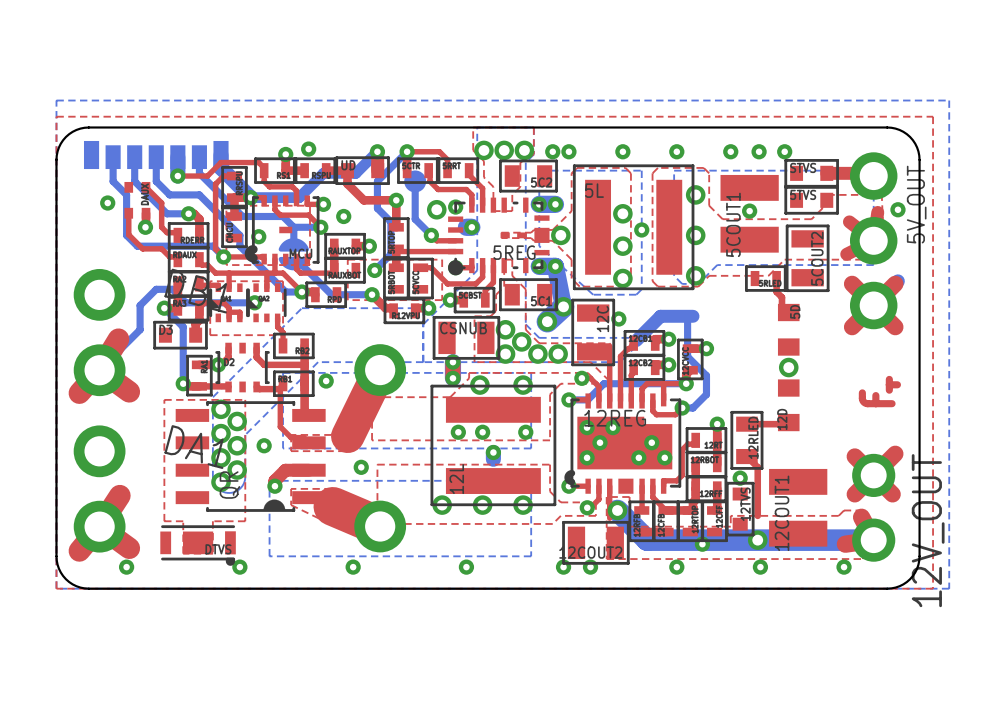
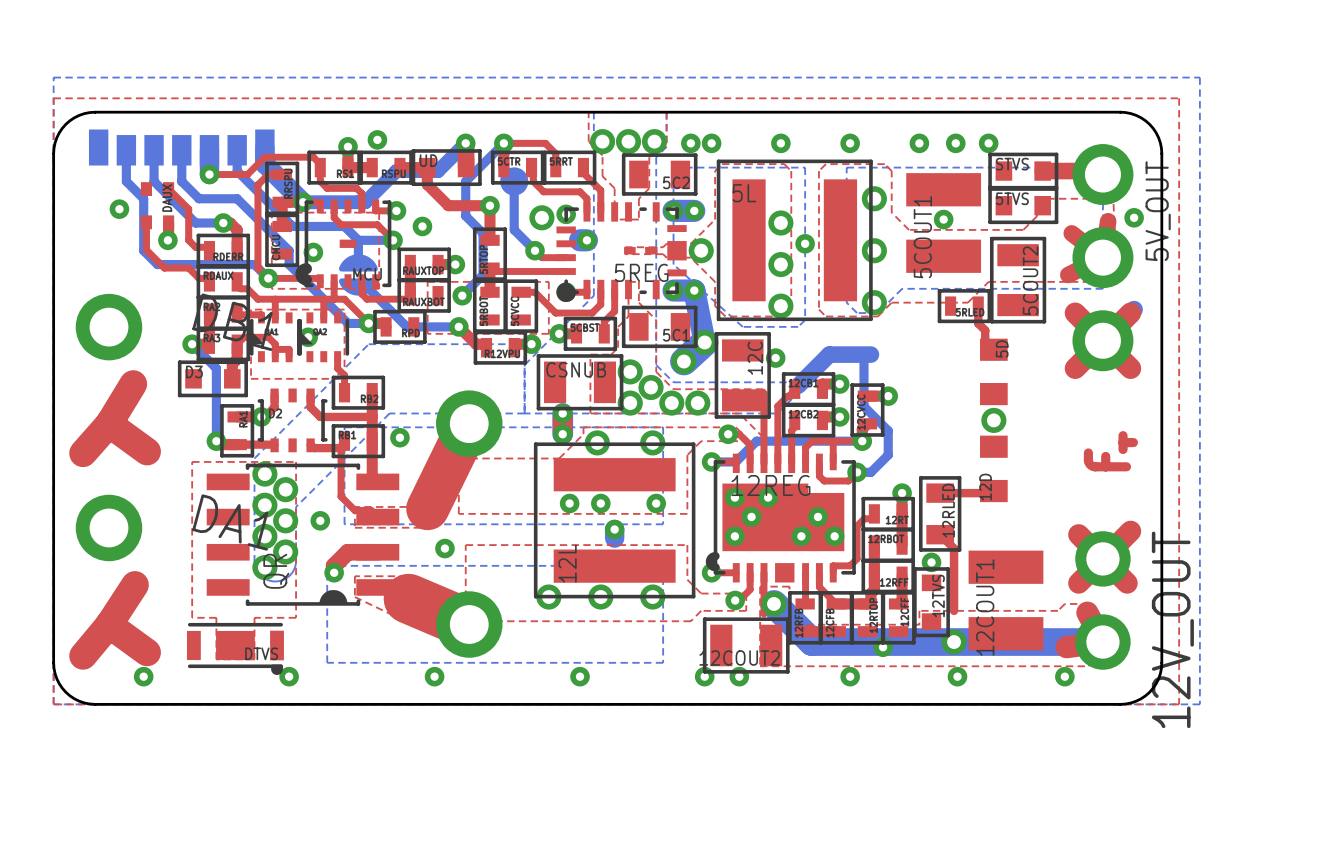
bottom track: (254, 302) (185, 302) (172, 289) (156, 289) (140, 305) (140, 329) (115, 354) -> none
part: (99, 370) -> none
part: (99, 526) -> none

